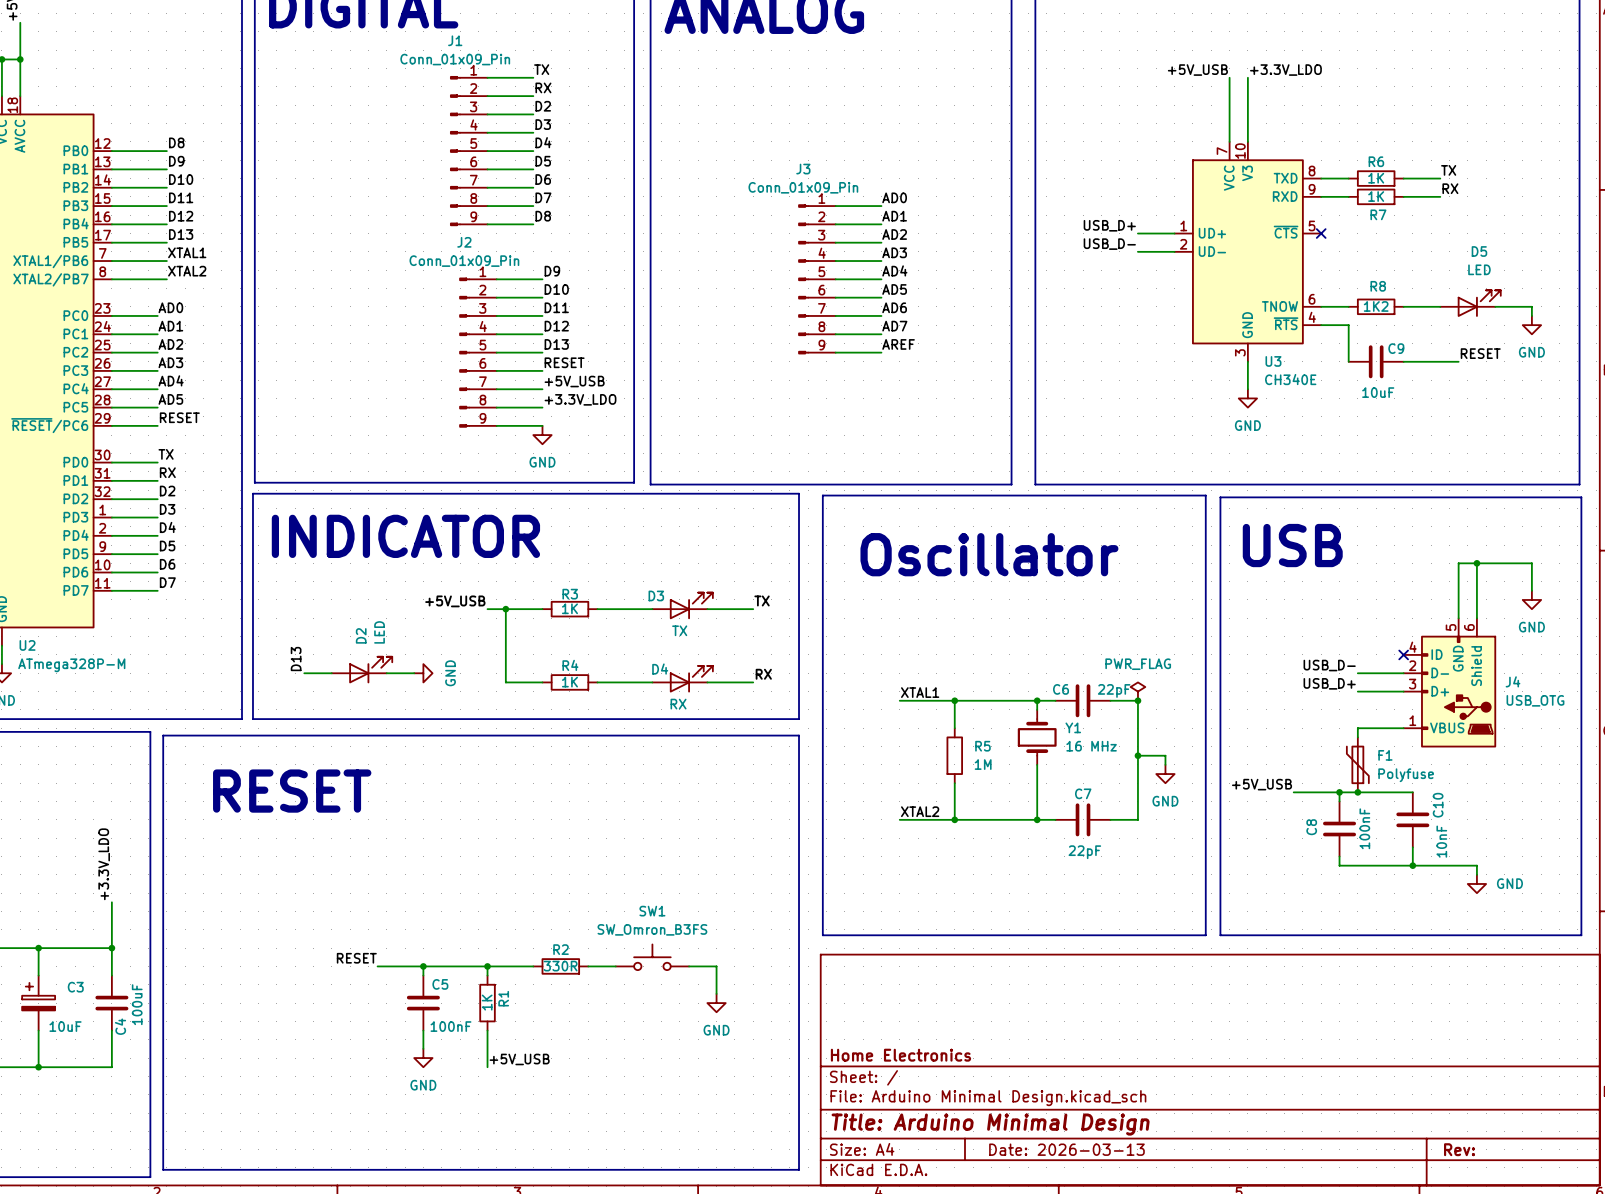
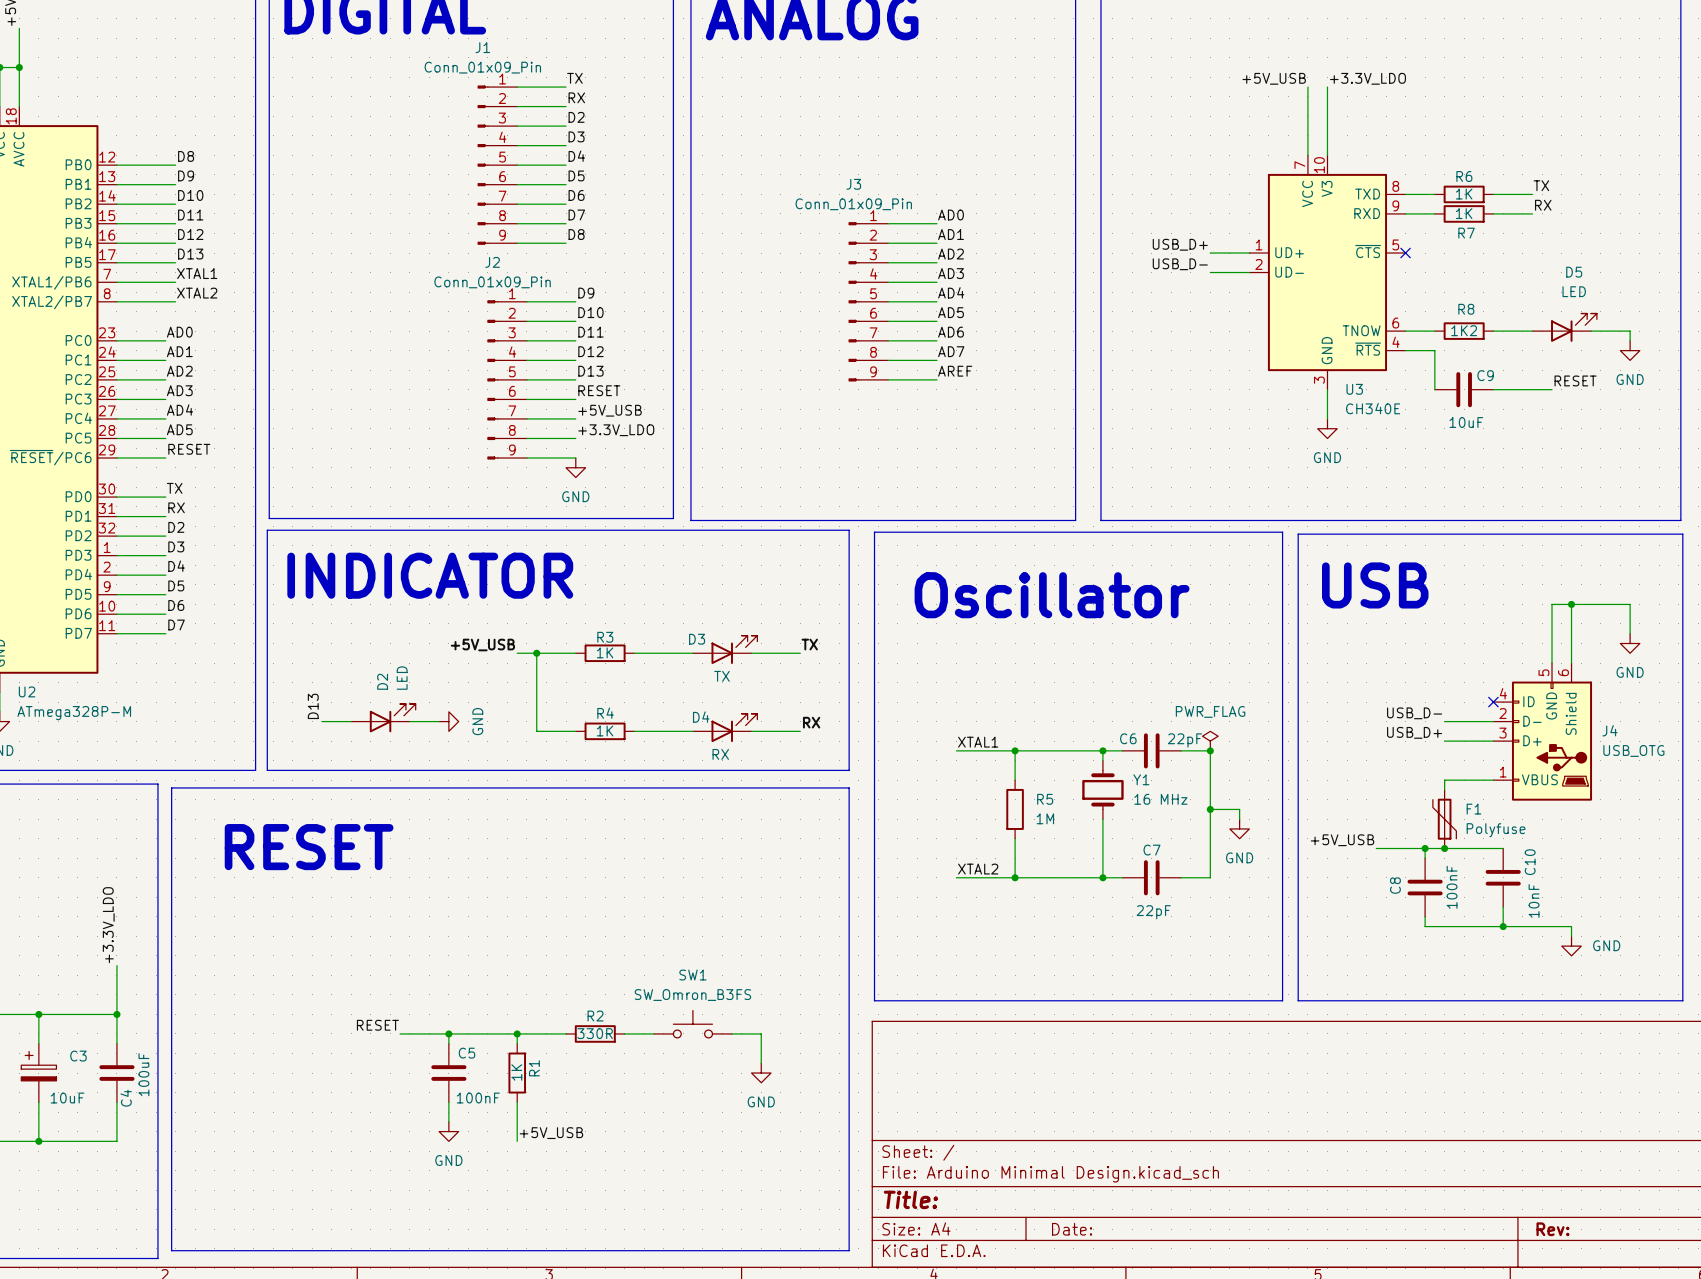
title block: Home Electronics (900, 1055) -> none
title block: Title: Arduino Minimal Design (990, 1124) -> Title: (910, 1199)
title block: Date: 2026-03-13 (1066, 1149) -> Date: (1072, 1229)

